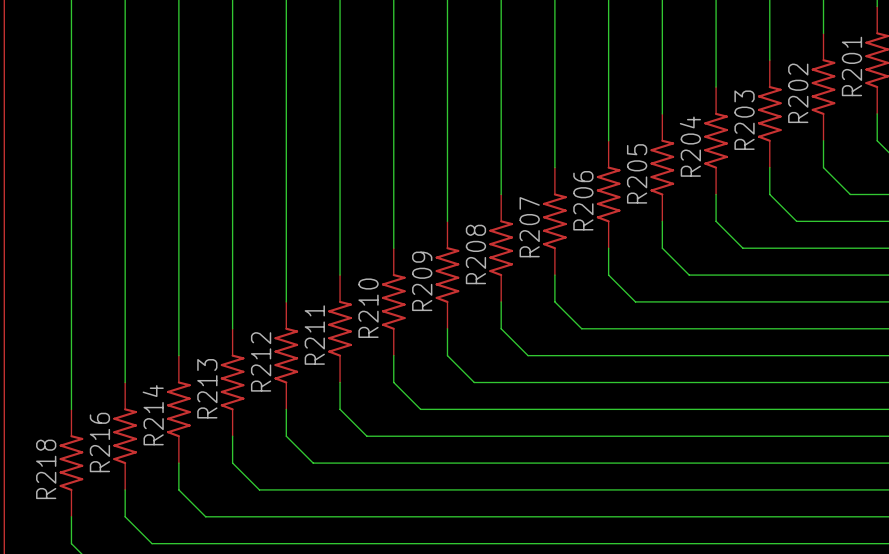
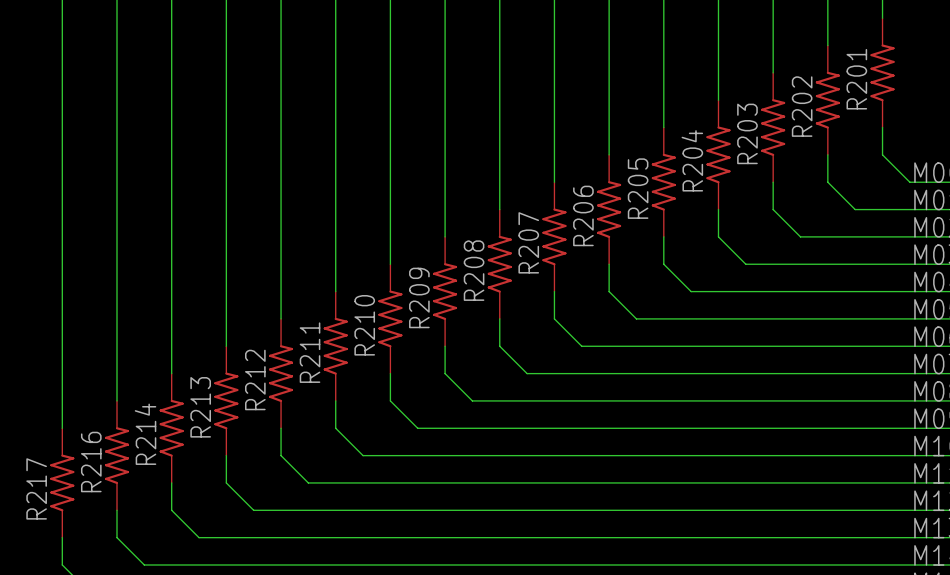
R218 name: R218 (46, 469) -> R217 (36, 488)

